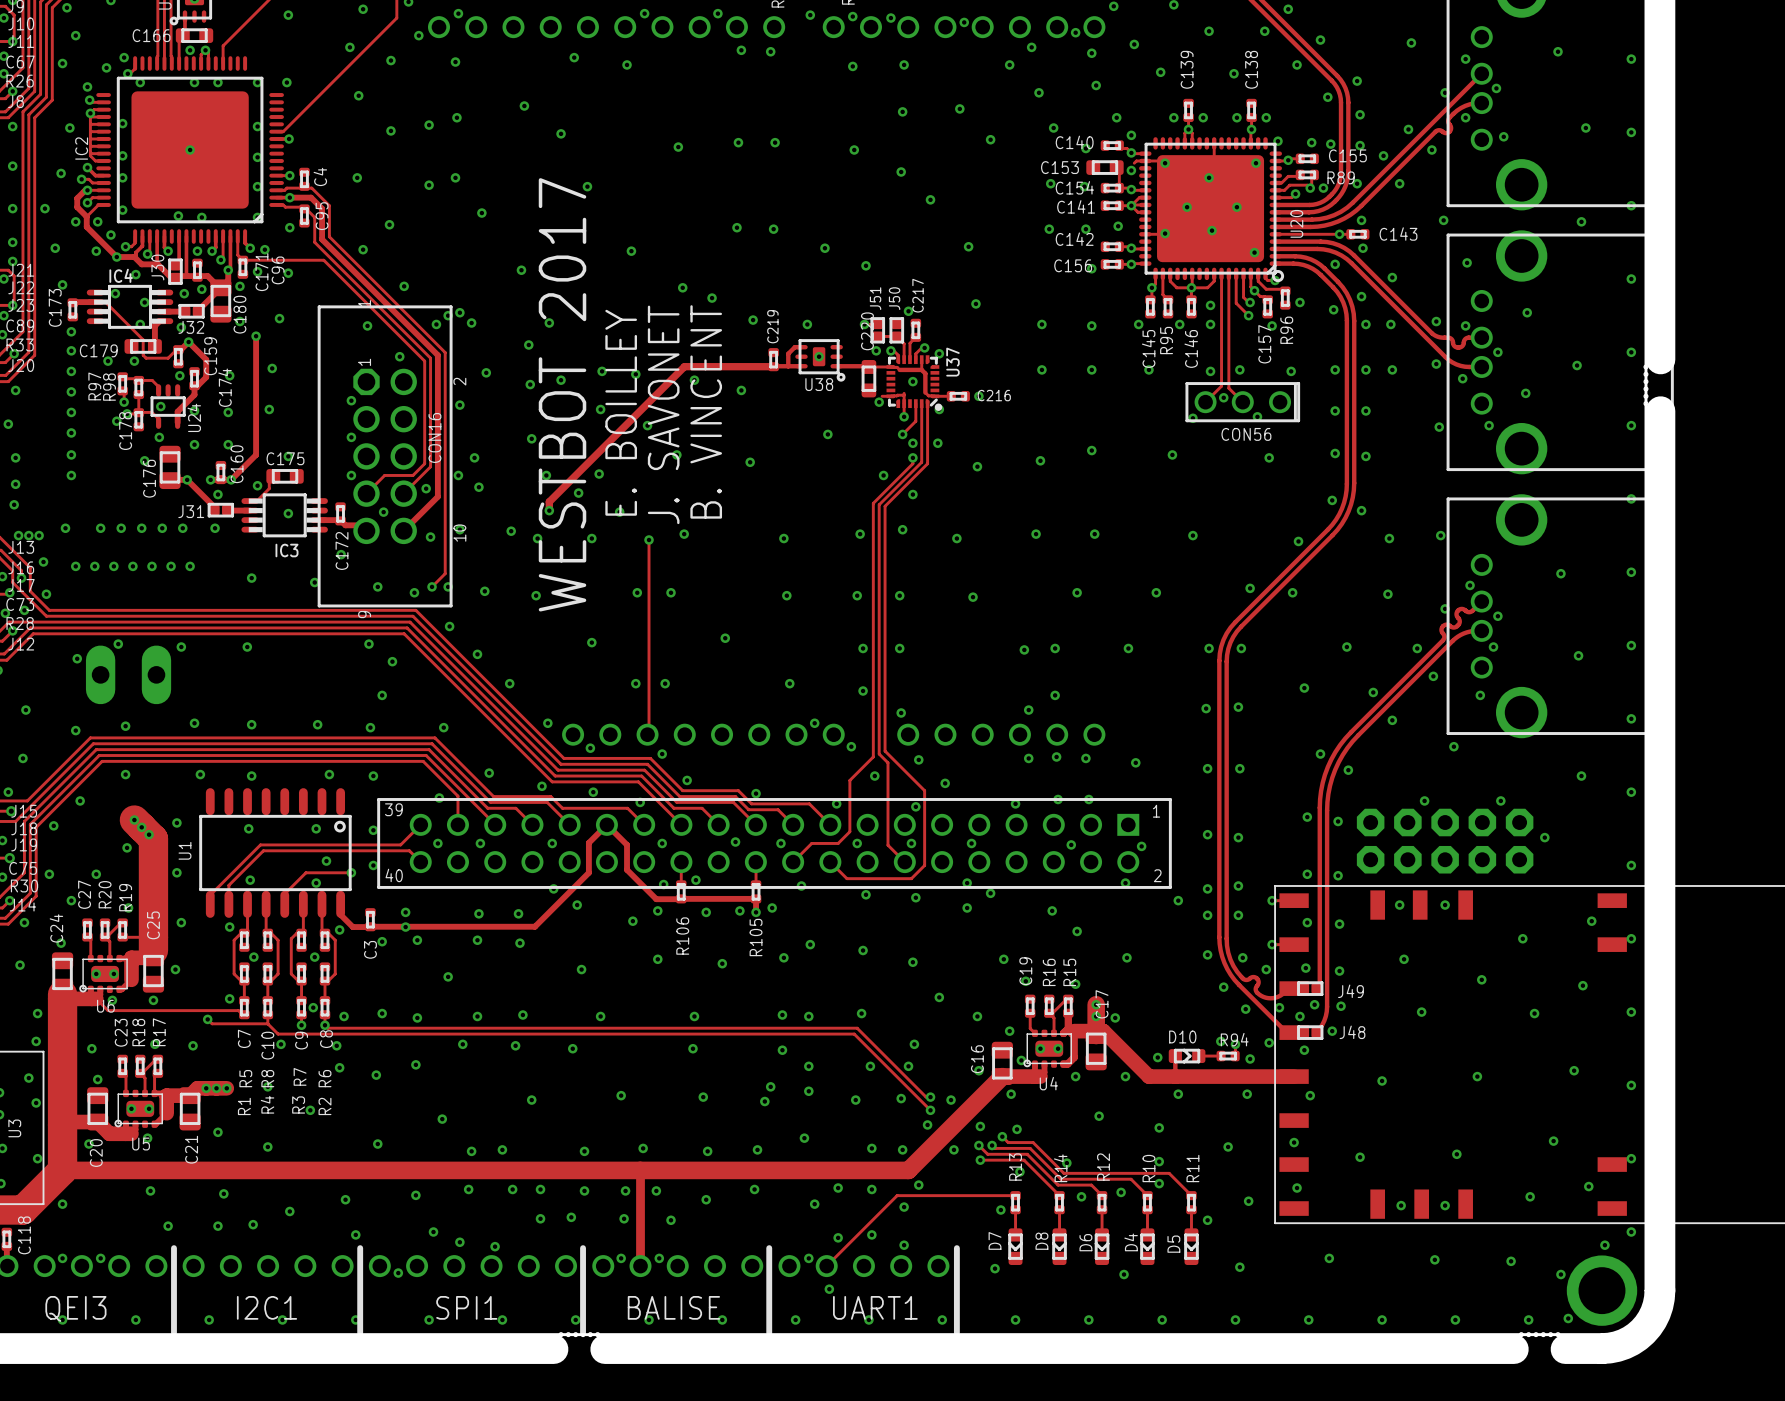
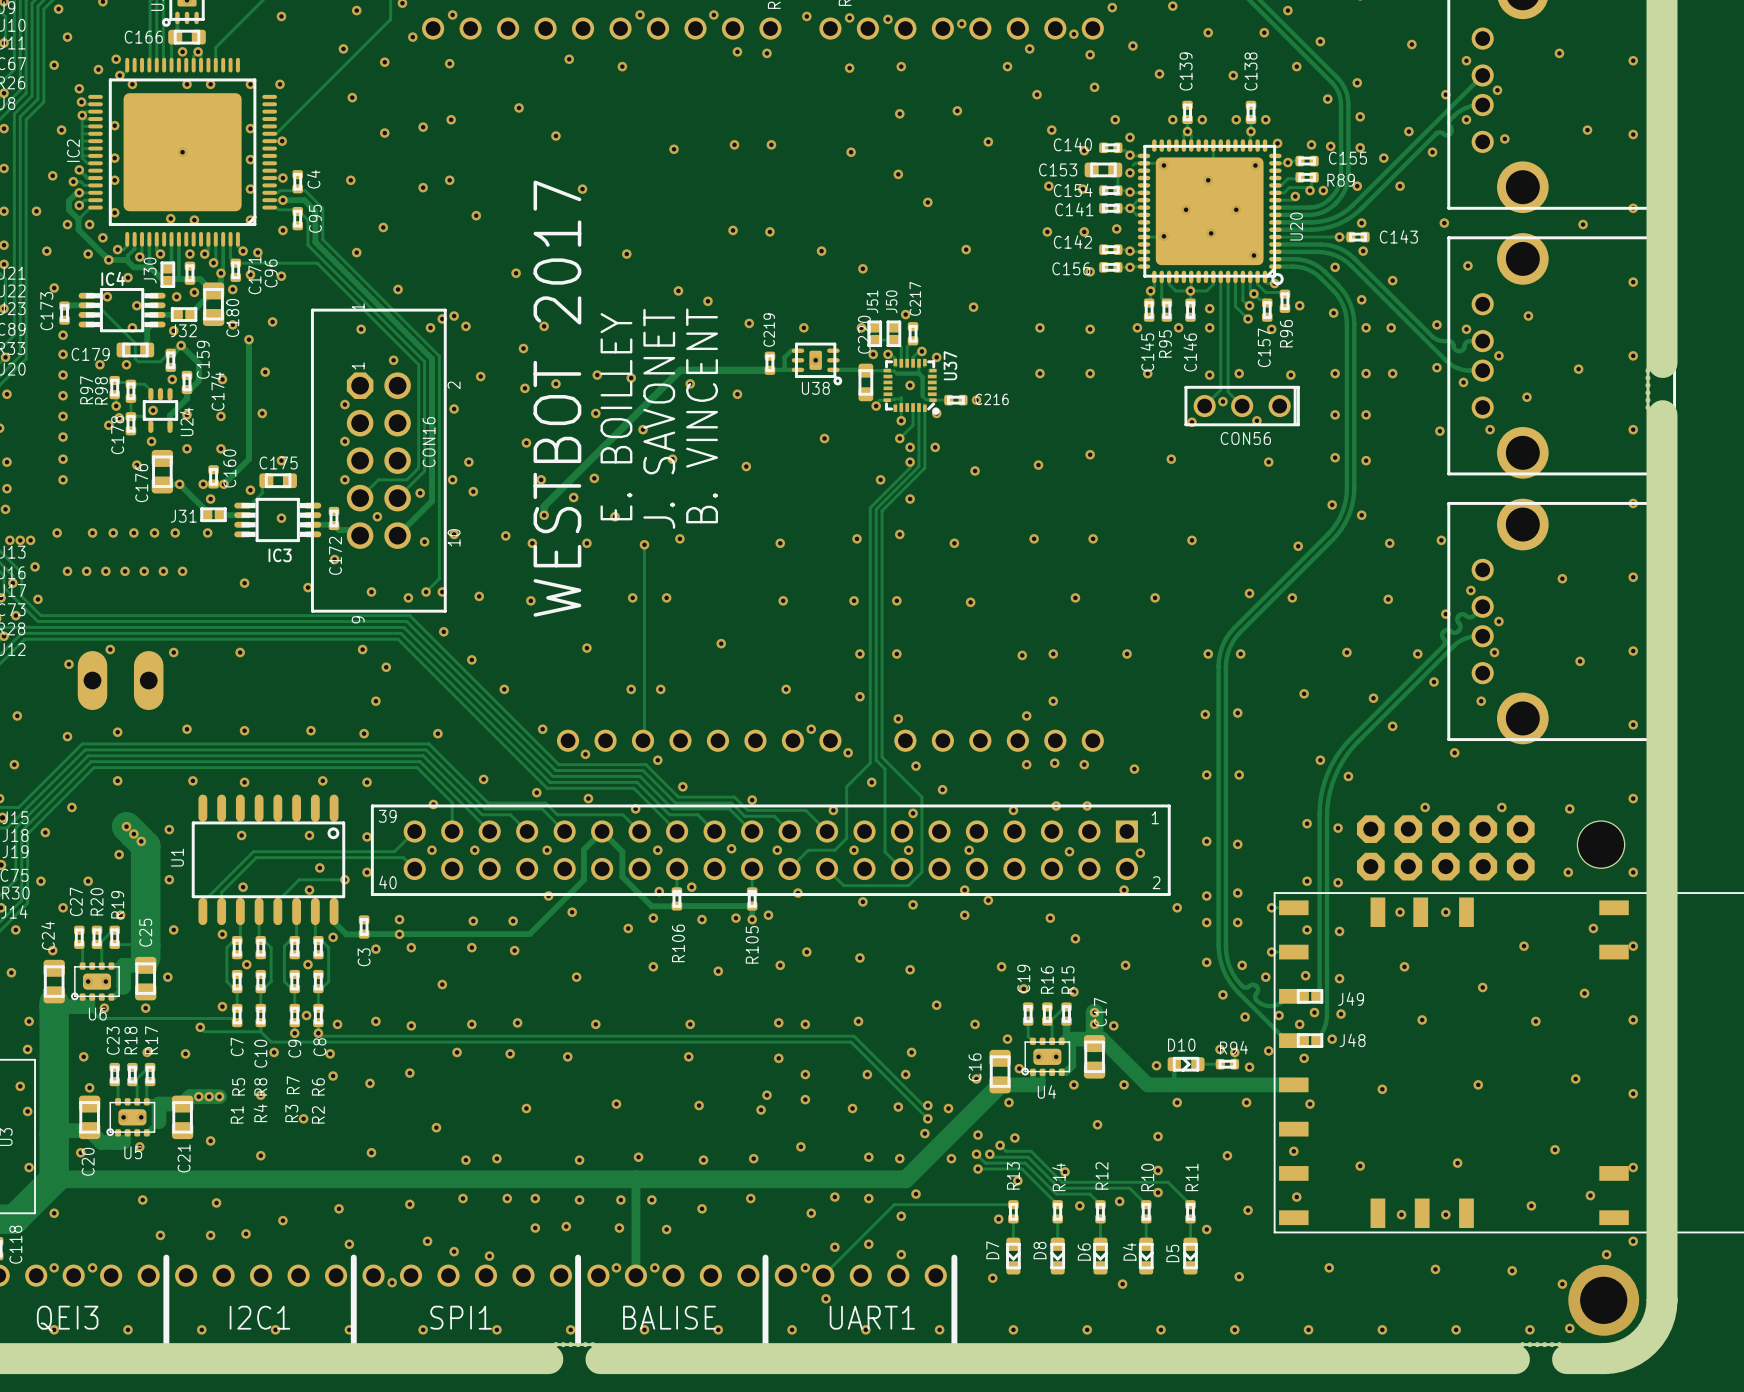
via: (1581, 776) -> none
via: none -> (1569, 808)
via: (1544, 837) -> none
hole: none -> (1601, 844)
via: none -> (1568, 872)

